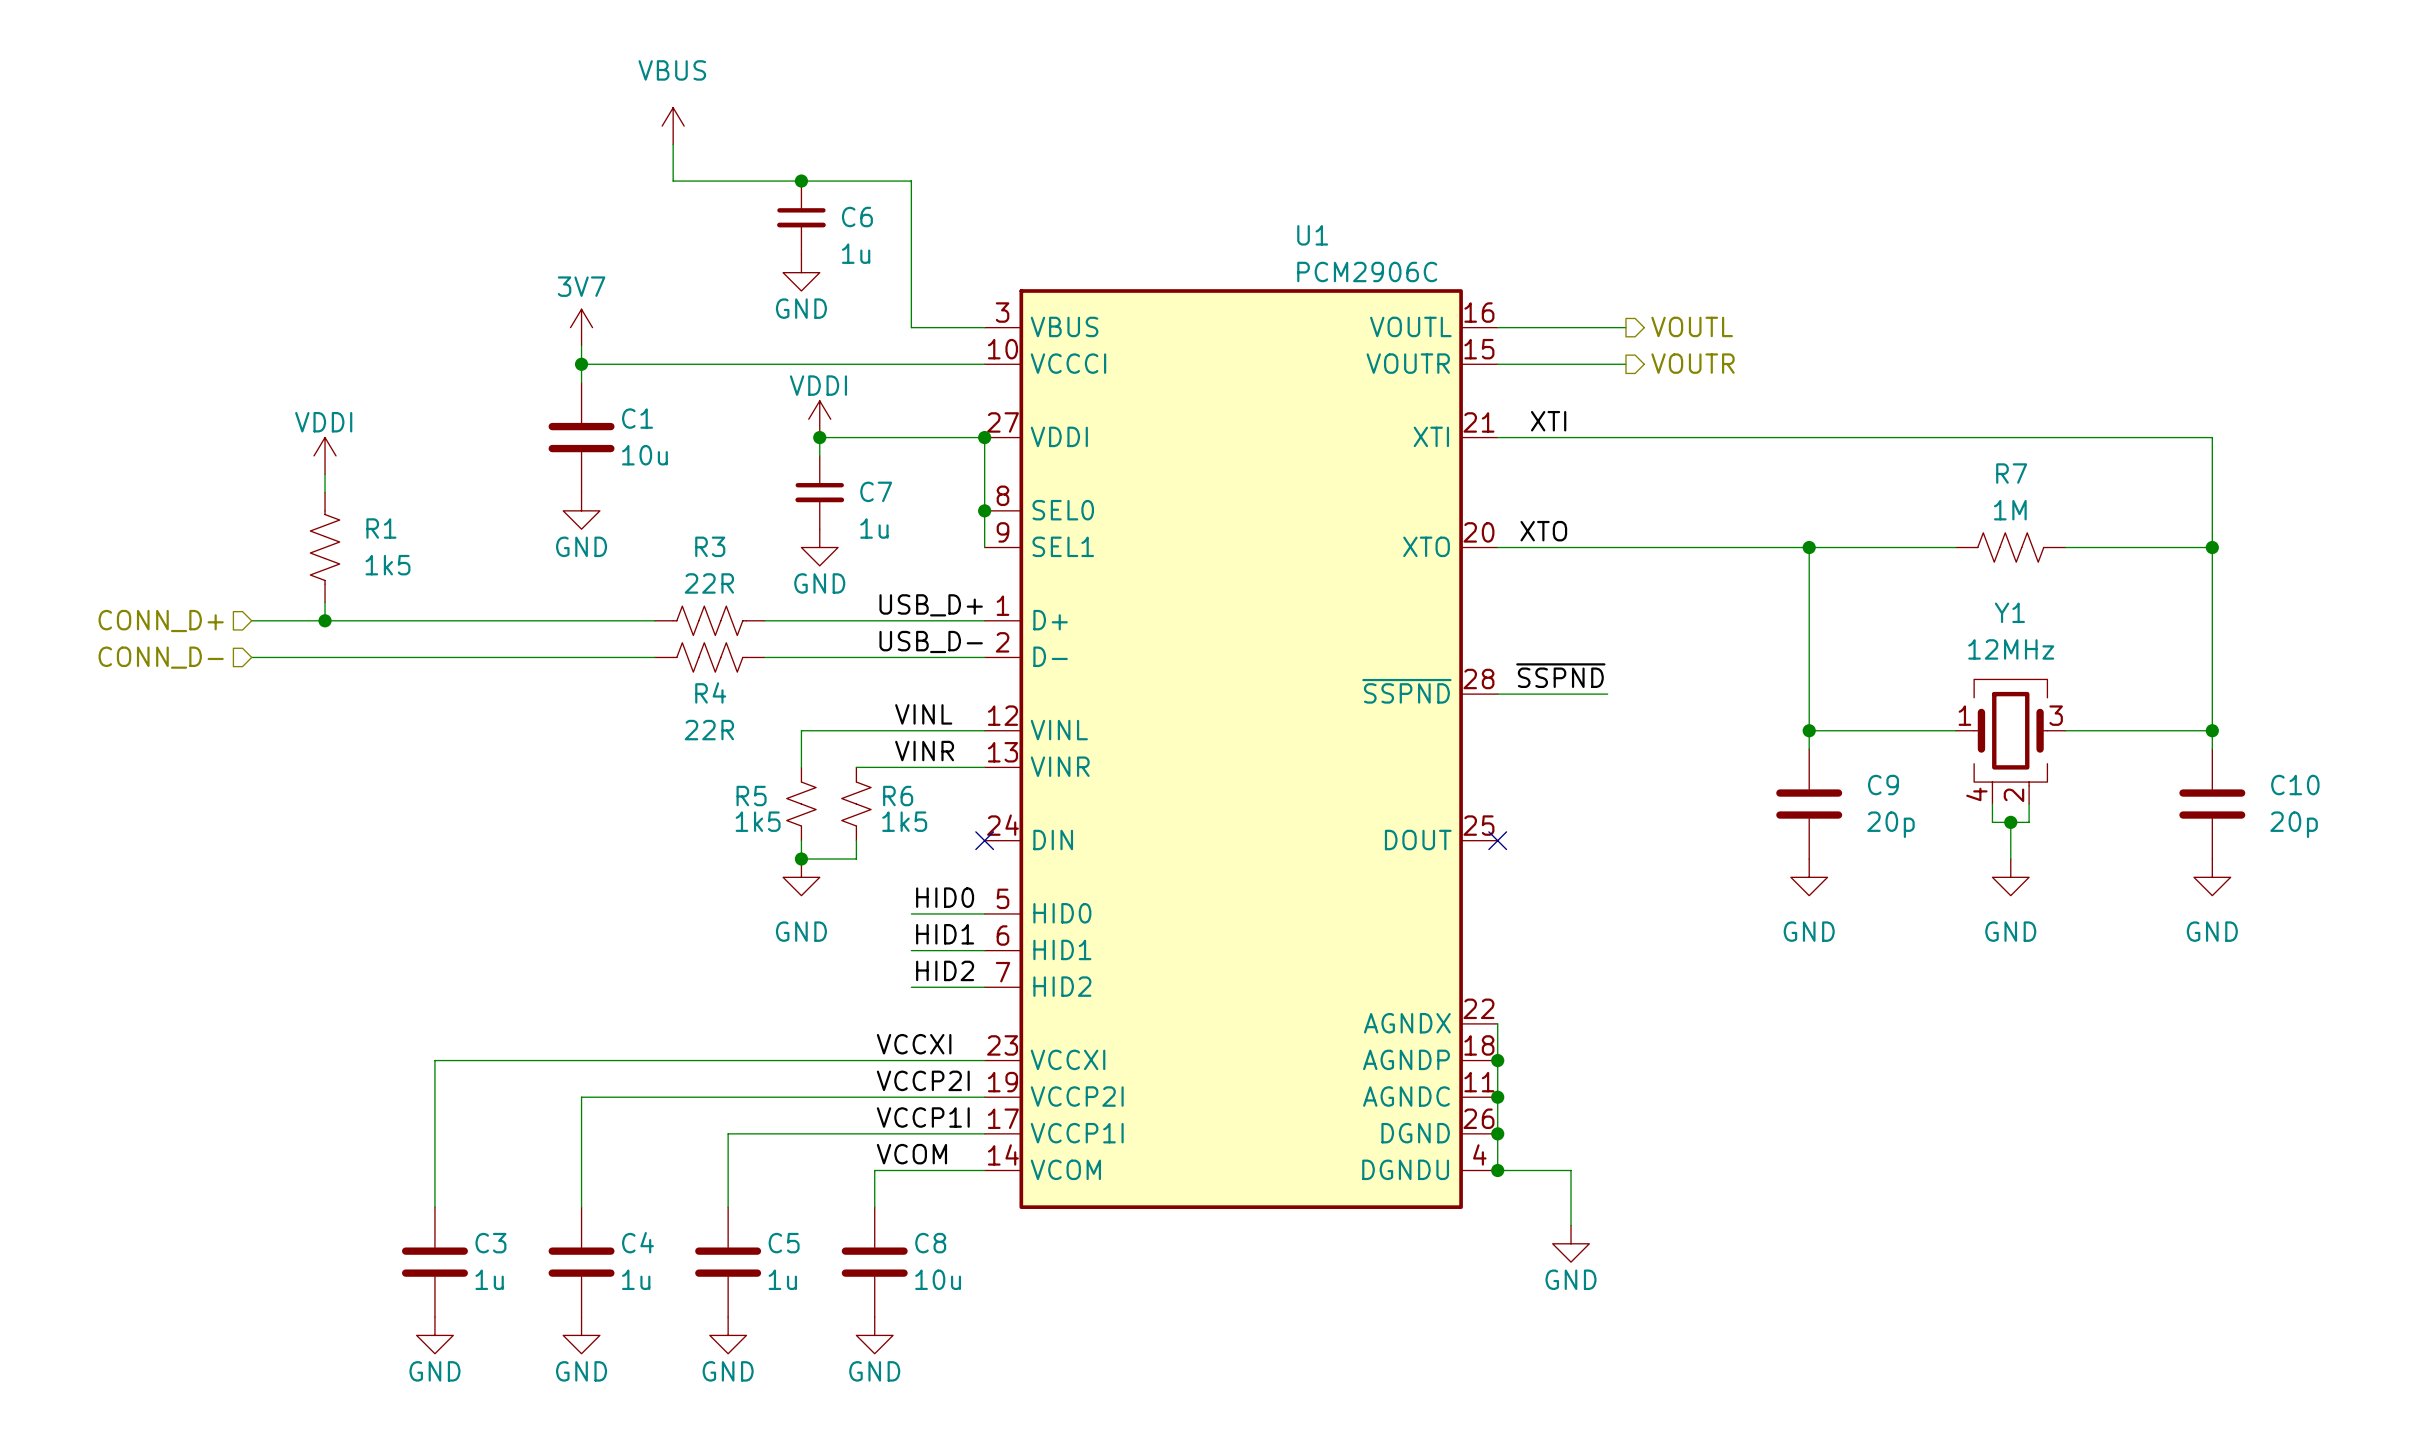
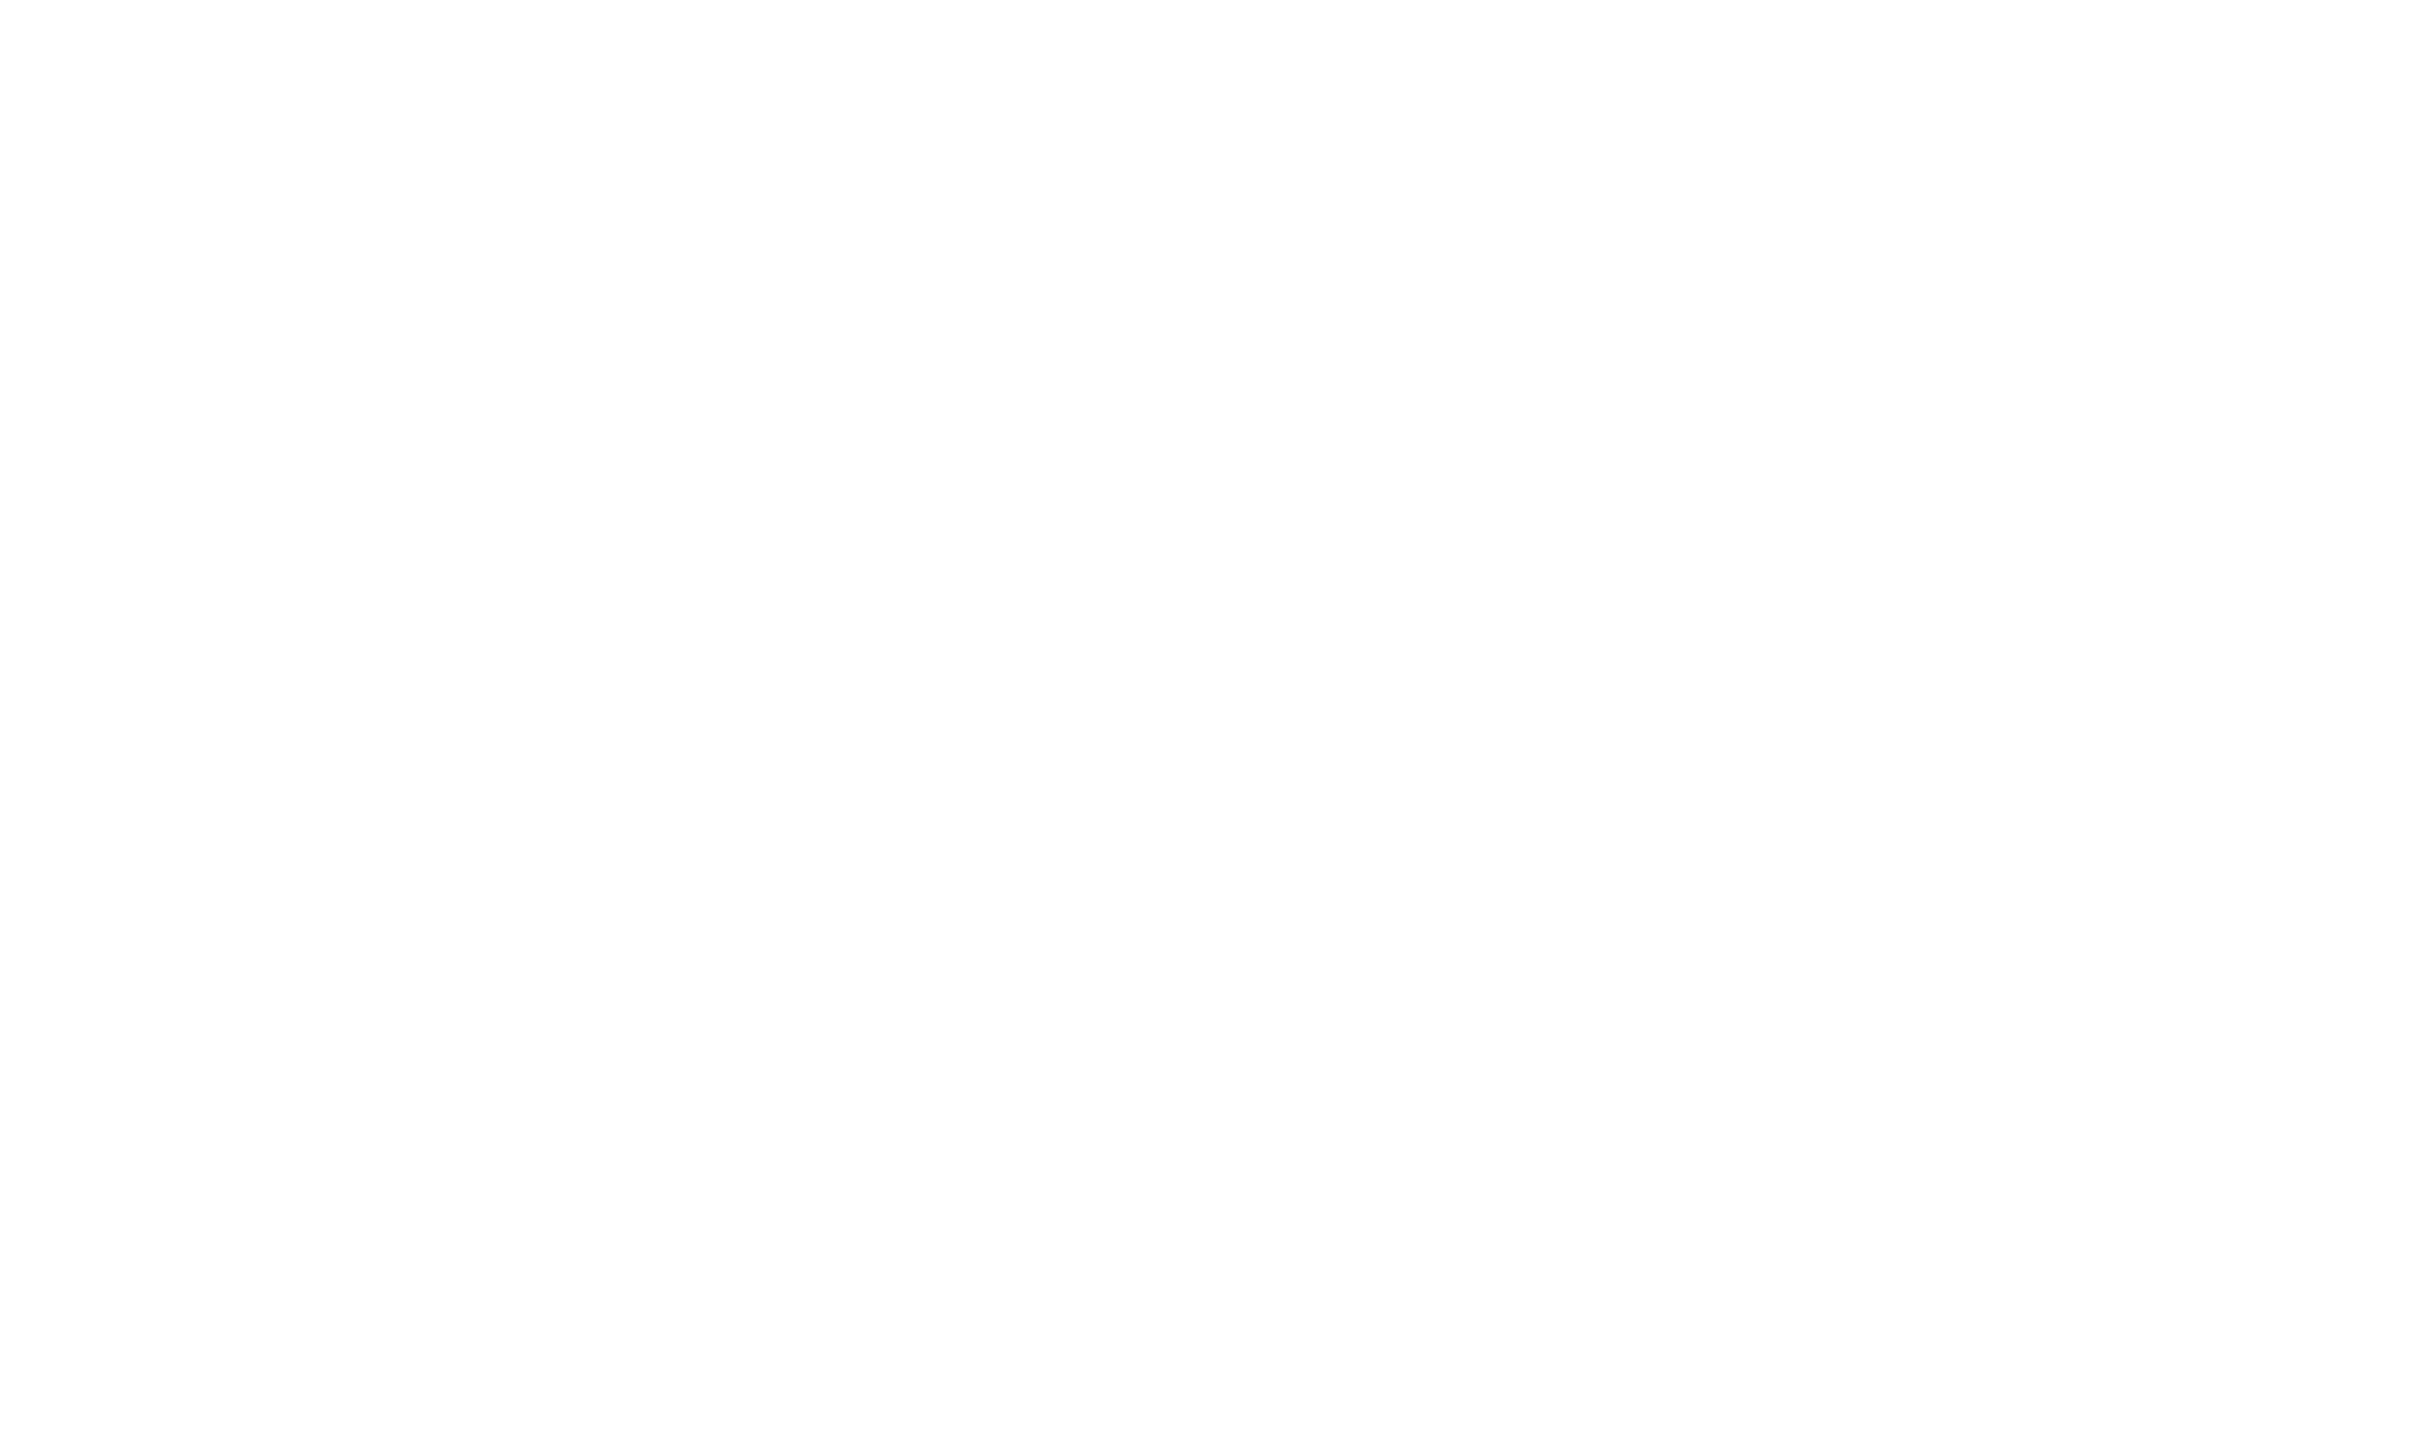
power symbol: VBUS (673, 126) -> none
wire: (673, 144) (673, 181) (911, 181) (911, 327) (984, 327) -> none
junction: (801, 181) -> none
C6: 1u (801, 217) -> none
power symbol: GND (801, 272) -> none
hierarchical label: VOUTL (1692, 326) -> none
power symbol: 3V7 (581, 327) -> none
wire: (1497, 327) (1625, 327) -> none
wire: (581, 345) (581, 382) -> none
hierarchical label: VOUTR (1693, 363) -> none
wire: (581, 364) (984, 364) -> none
junction: (581, 364) -> none
wire: (1497, 364) (1625, 364) -> none
power symbol: VDDI (819, 419) -> none
label: XTI (1548, 421) -> none
C1: 10u (581, 437) -> none
junction: (819, 437) -> none
junction: (984, 437) -> none
wire: (1497, 437) (2212, 437) (2212, 749) -> none
power symbol: VDDI (325, 455) -> none
wire: (819, 455) (819, 437) (984, 437) (984, 547) -> none
wire: (325, 474) (325, 492) -> none
C7: 1u (819, 492) -> none
power symbol: GND (581, 510) -> none
junction: (984, 510) -> none
label: XTO (1543, 531) -> none
R1: 1k5 (325, 547) -> none
power symbol: GND (819, 547) -> none
wire: (1497, 547) (1955, 547) -> none
wire: (1809, 547) (1809, 749) -> none
junction: (1809, 547) -> none
R7: 1M (2010, 547) -> none
wire: (2065, 547) (2212, 547) -> none
junction: (2212, 547) -> none
wire: (325, 602) (325, 620) -> none
label: USB_D+ (931, 605) -> none
hierarchical label: CONN_D+ (161, 620) -> none
wire: (251, 620) (654, 620) -> none
junction: (325, 620) -> none
R3: 22R (709, 620) -> none
wire: (764, 620) (984, 620) -> none
label: USB_D- (931, 641) -> none
hierarchical label: CONN_D- (161, 657) -> none
wire: (251, 657) (654, 657) -> none
R4: 22R (709, 657) -> none
wire: (764, 657) (984, 657) -> none
label: ~{SSPND} (1560, 675) -> none
wire: (1497, 694) (1607, 694) -> none
label: VINL (923, 714) -> none
wire: (984, 730) (801, 730) (801, 767) -> none
wire: (1809, 730) (1955, 730) -> none
junction: (1809, 730) -> none
wire: (2065, 730) (2212, 730) -> none
junction: (2212, 730) -> none
Y1: 12MHz (2010, 741) -> none
U1: PCM2906C (1241, 749) -> none
label: VINR (924, 751) -> none
wire: (856, 767) (984, 767) -> none
R5: 1k5 (801, 804) -> none
R6: 1k5 (856, 804) -> none
C9: 20p (1809, 804) -> none
wire: (1992, 804) (1992, 822) (2029, 822) (2029, 804) -> none
C10: 20p (2212, 804) -> none
wire: (2010, 822) (2010, 859) -> none
junction: (2010, 822) -> none
wire: (801, 840) (801, 859) (856, 859) (856, 840) -> none
no-connect mark: (984, 840) -> none
no-connect mark: (1497, 840) -> none
junction: (801, 859) -> none
power symbol: GND (801, 877) -> none
power symbol: GND (1809, 877) -> none
power symbol: GND (2010, 877) -> none
power symbol: GND (2212, 877) -> none
label: HID0 (945, 897) -> none
wire: (911, 913) (984, 913) -> none
label: HID1 (945, 934) -> none
wire: (911, 950) (984, 950) -> none
label: HID2 (945, 970) -> none
wire: (911, 987) (984, 987) -> none
wire: (1497, 1023) (1497, 1170) (1571, 1170) (1571, 1225) -> none
label: VCCXI (914, 1044) -> none
wire: (984, 1060) (434, 1060) (434, 1207) -> none
junction: (1497, 1060) -> none
label: VCCP2I (923, 1080) -> none
wire: (984, 1097) (581, 1097) (581, 1207) -> none
junction: (1497, 1097) -> none
label: VCCP1I (923, 1117) -> none
wire: (984, 1133) (728, 1133) (728, 1207) -> none
junction: (1497, 1133) -> none
label: VCOM (911, 1154) -> none
wire: (984, 1170) (874, 1170) (874, 1207) -> none
junction: (1497, 1170) -> none
power symbol: GND (1571, 1243) -> none
C3: 1u (434, 1262) -> none
C4: 1u (581, 1262) -> none
C5: 1u (728, 1262) -> none
C8: 10u (874, 1262) -> none
power symbol: GND (434, 1335) -> none
power symbol: GND (581, 1335) -> none
power symbol: GND (728, 1335) -> none
power symbol: GND (874, 1335) -> none

